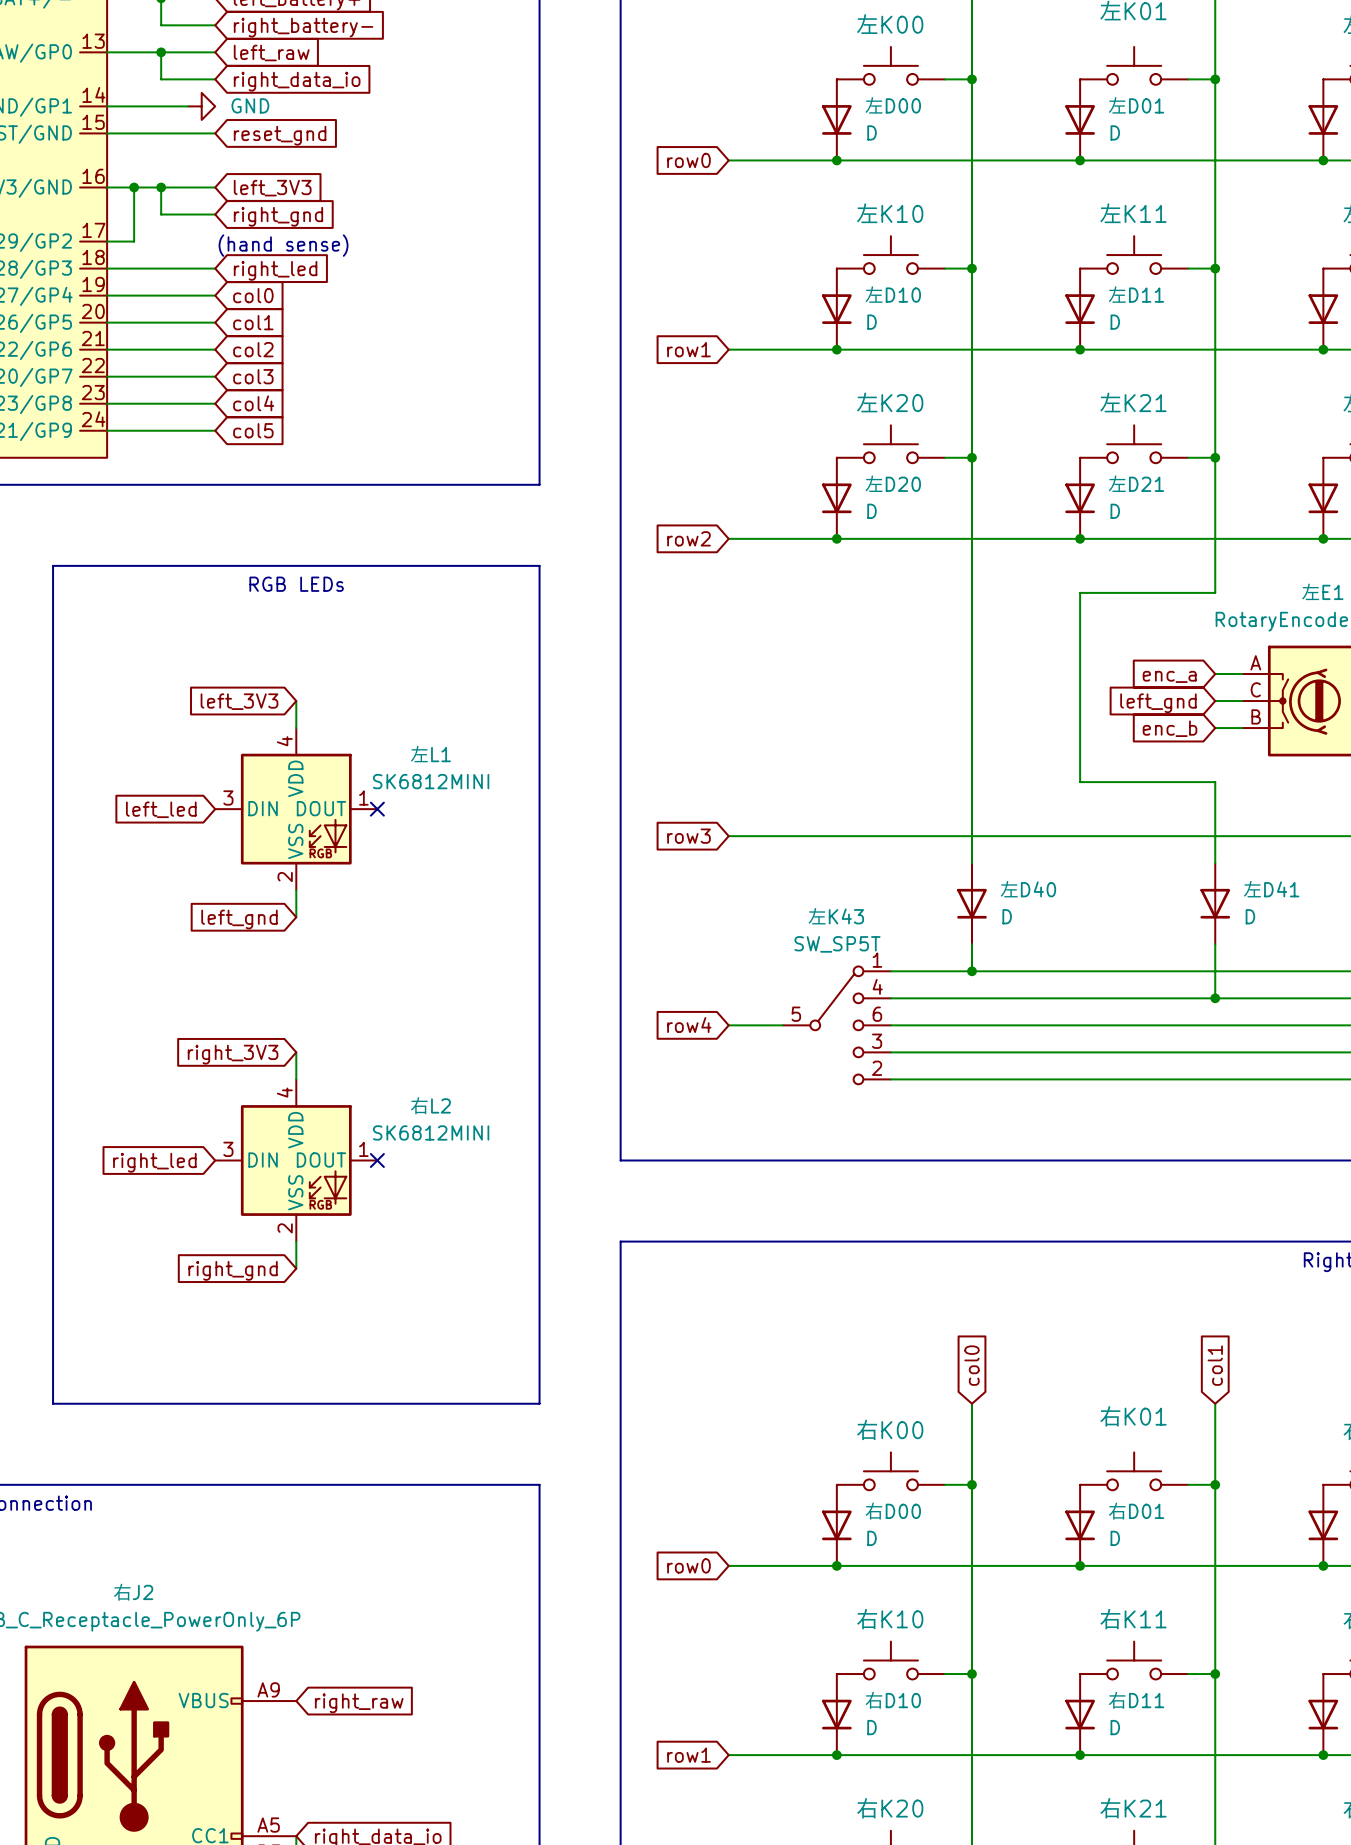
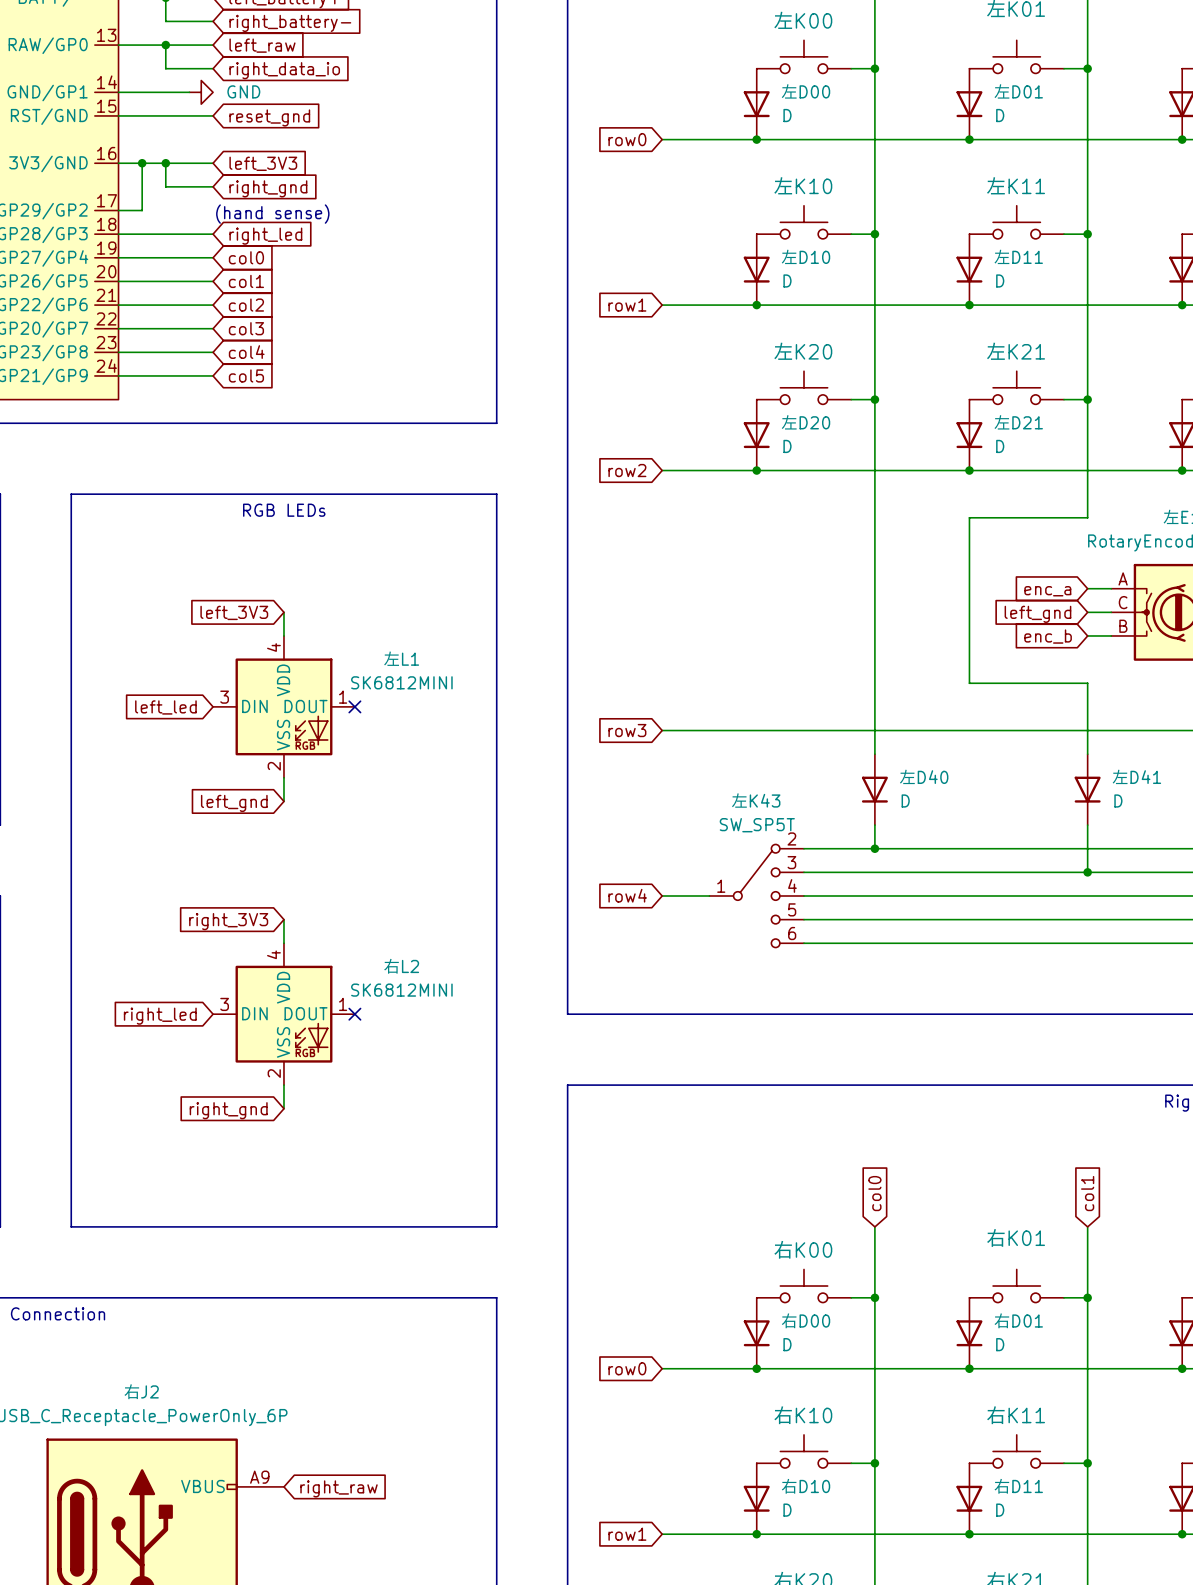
左K43 pin number: 1 (877, 960) -> 2 (791, 838)
左K43 pin number: 4 (877, 986) -> 3 (791, 862)
左K43 pin number: 5 (796, 1014) -> 1 (721, 886)
左K43 pin number: 6 (877, 1014) -> 4 (792, 885)
左K43 pin number: 3 (877, 1041) -> 5 (792, 909)
左K43 pin number: 2 (877, 1068) -> 6 (792, 933)

